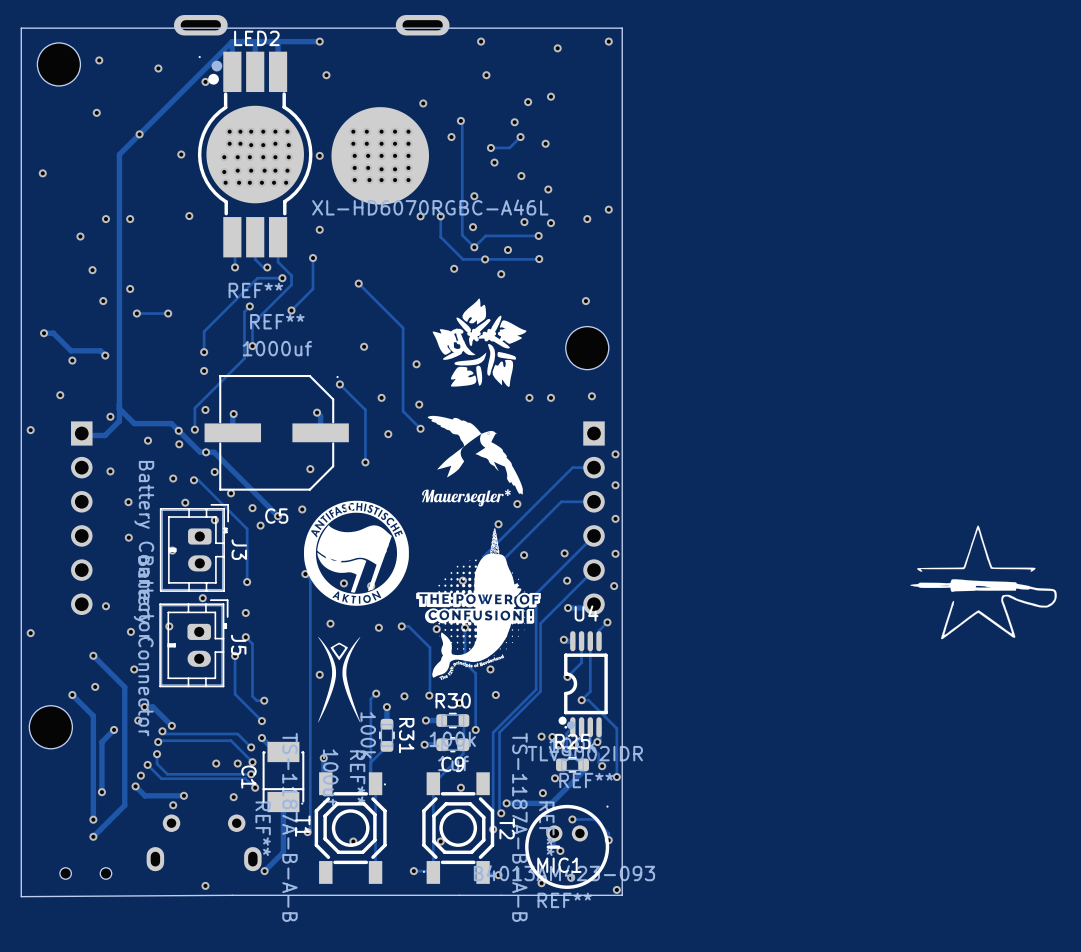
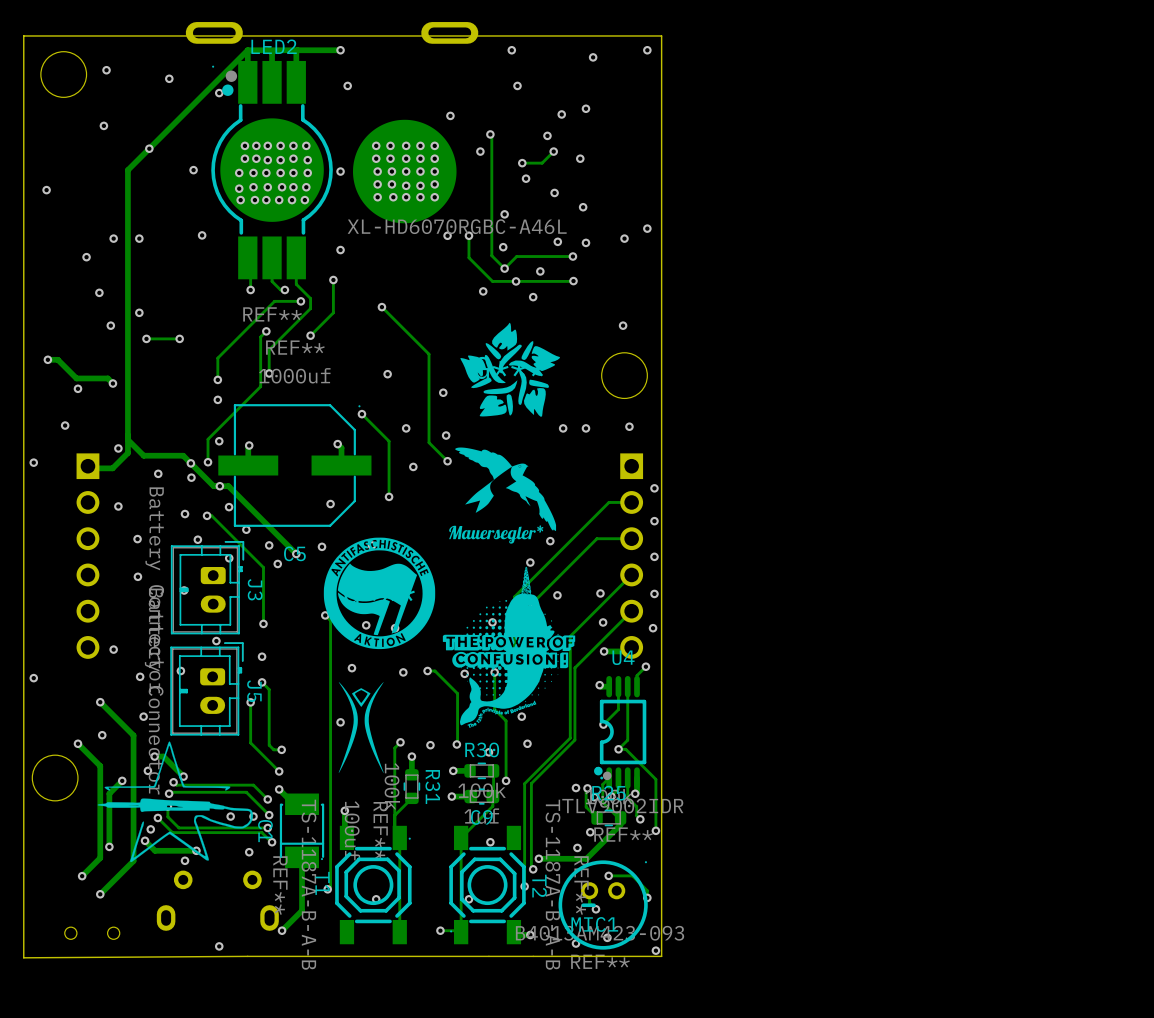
drawing: [910, 525, 1057, 640] -> none
drawing: none -> [97, 741, 253, 863]
track: (93, 802) (93, 819) -> (100, 858) (82, 876)
via position: (93, 819) -> (82, 876)

